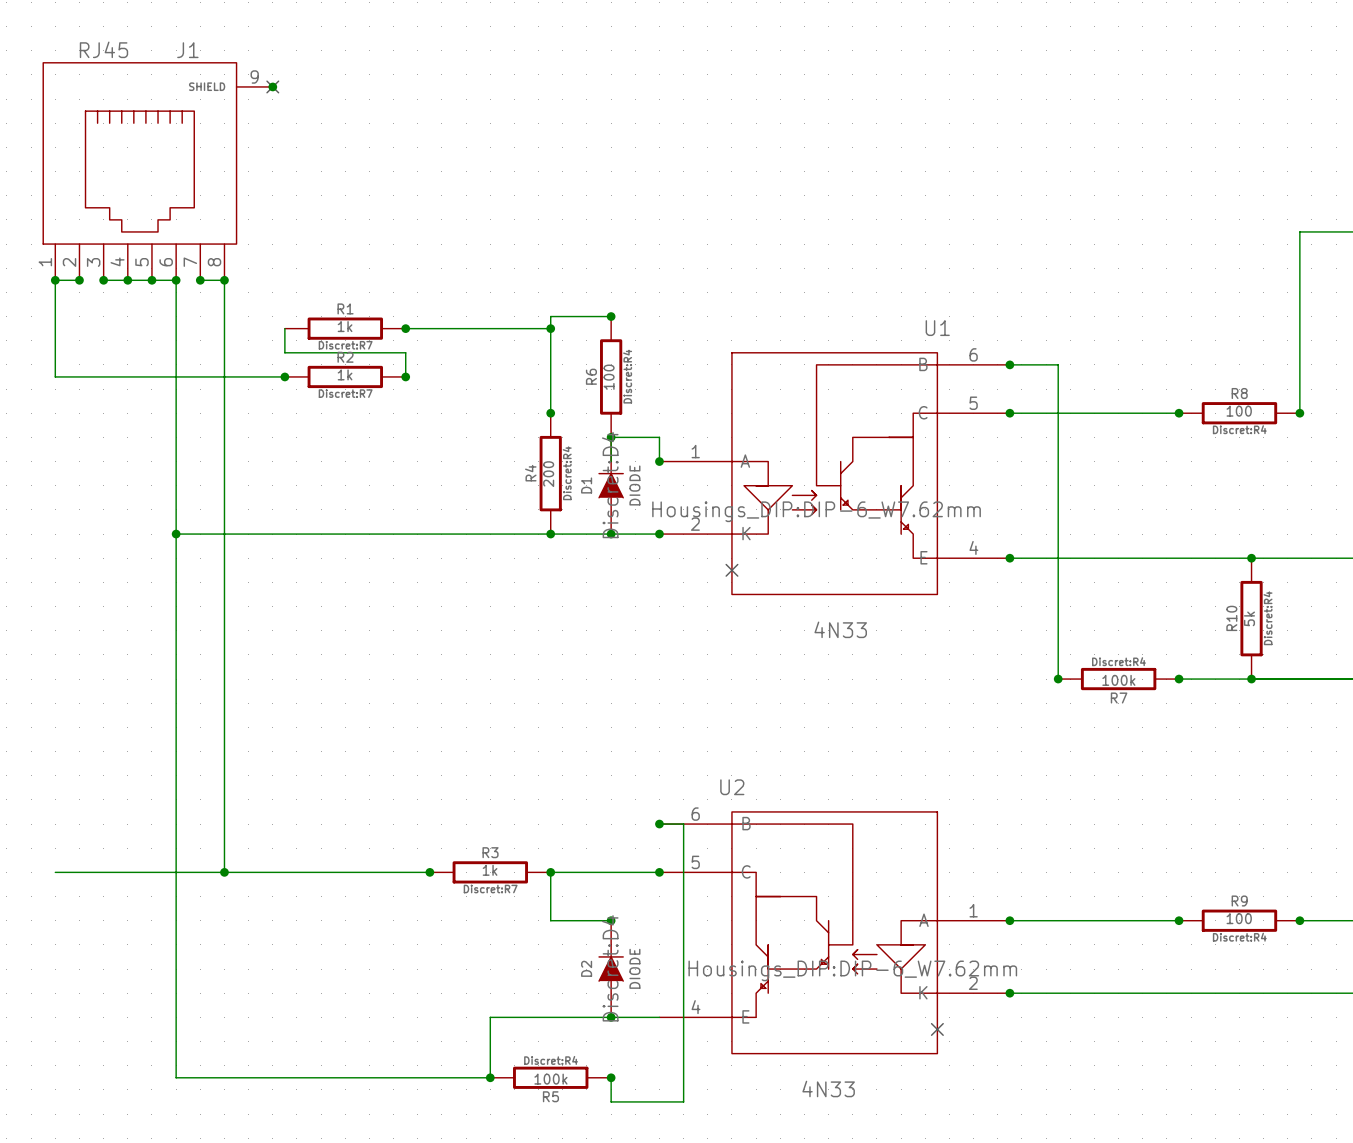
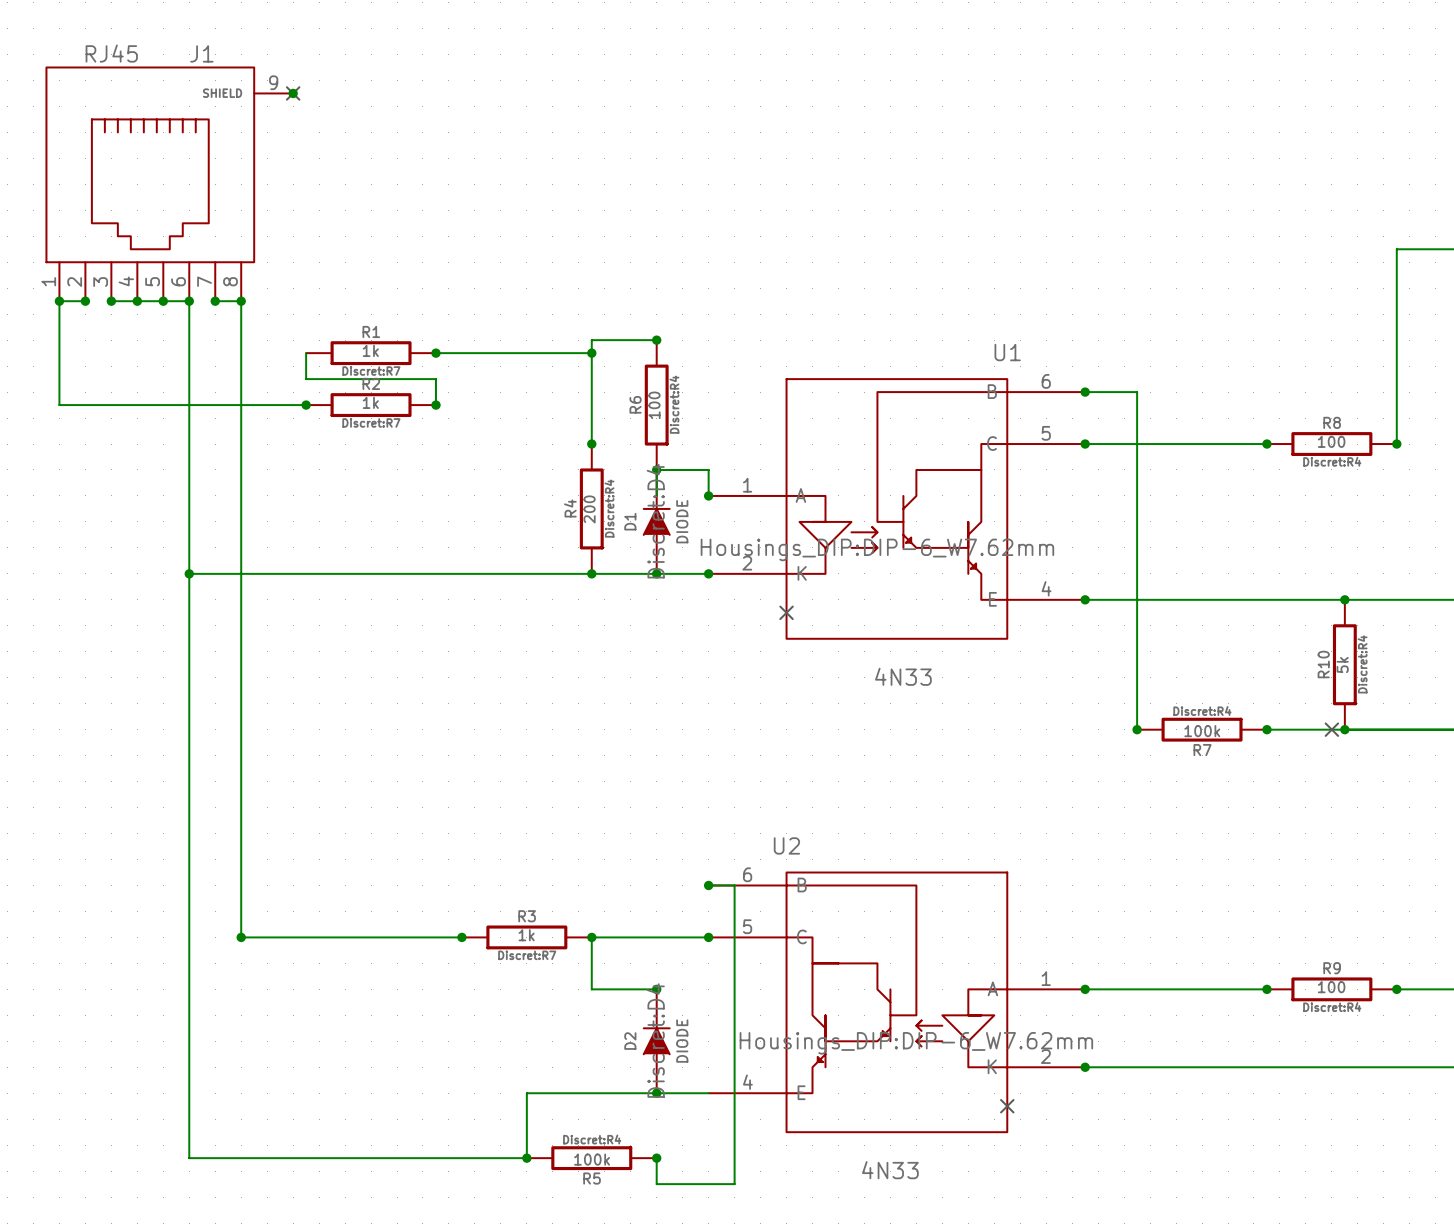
no-connect mark: none -> (1331, 729)
wire: (55, 872) (224, 872) -> none

